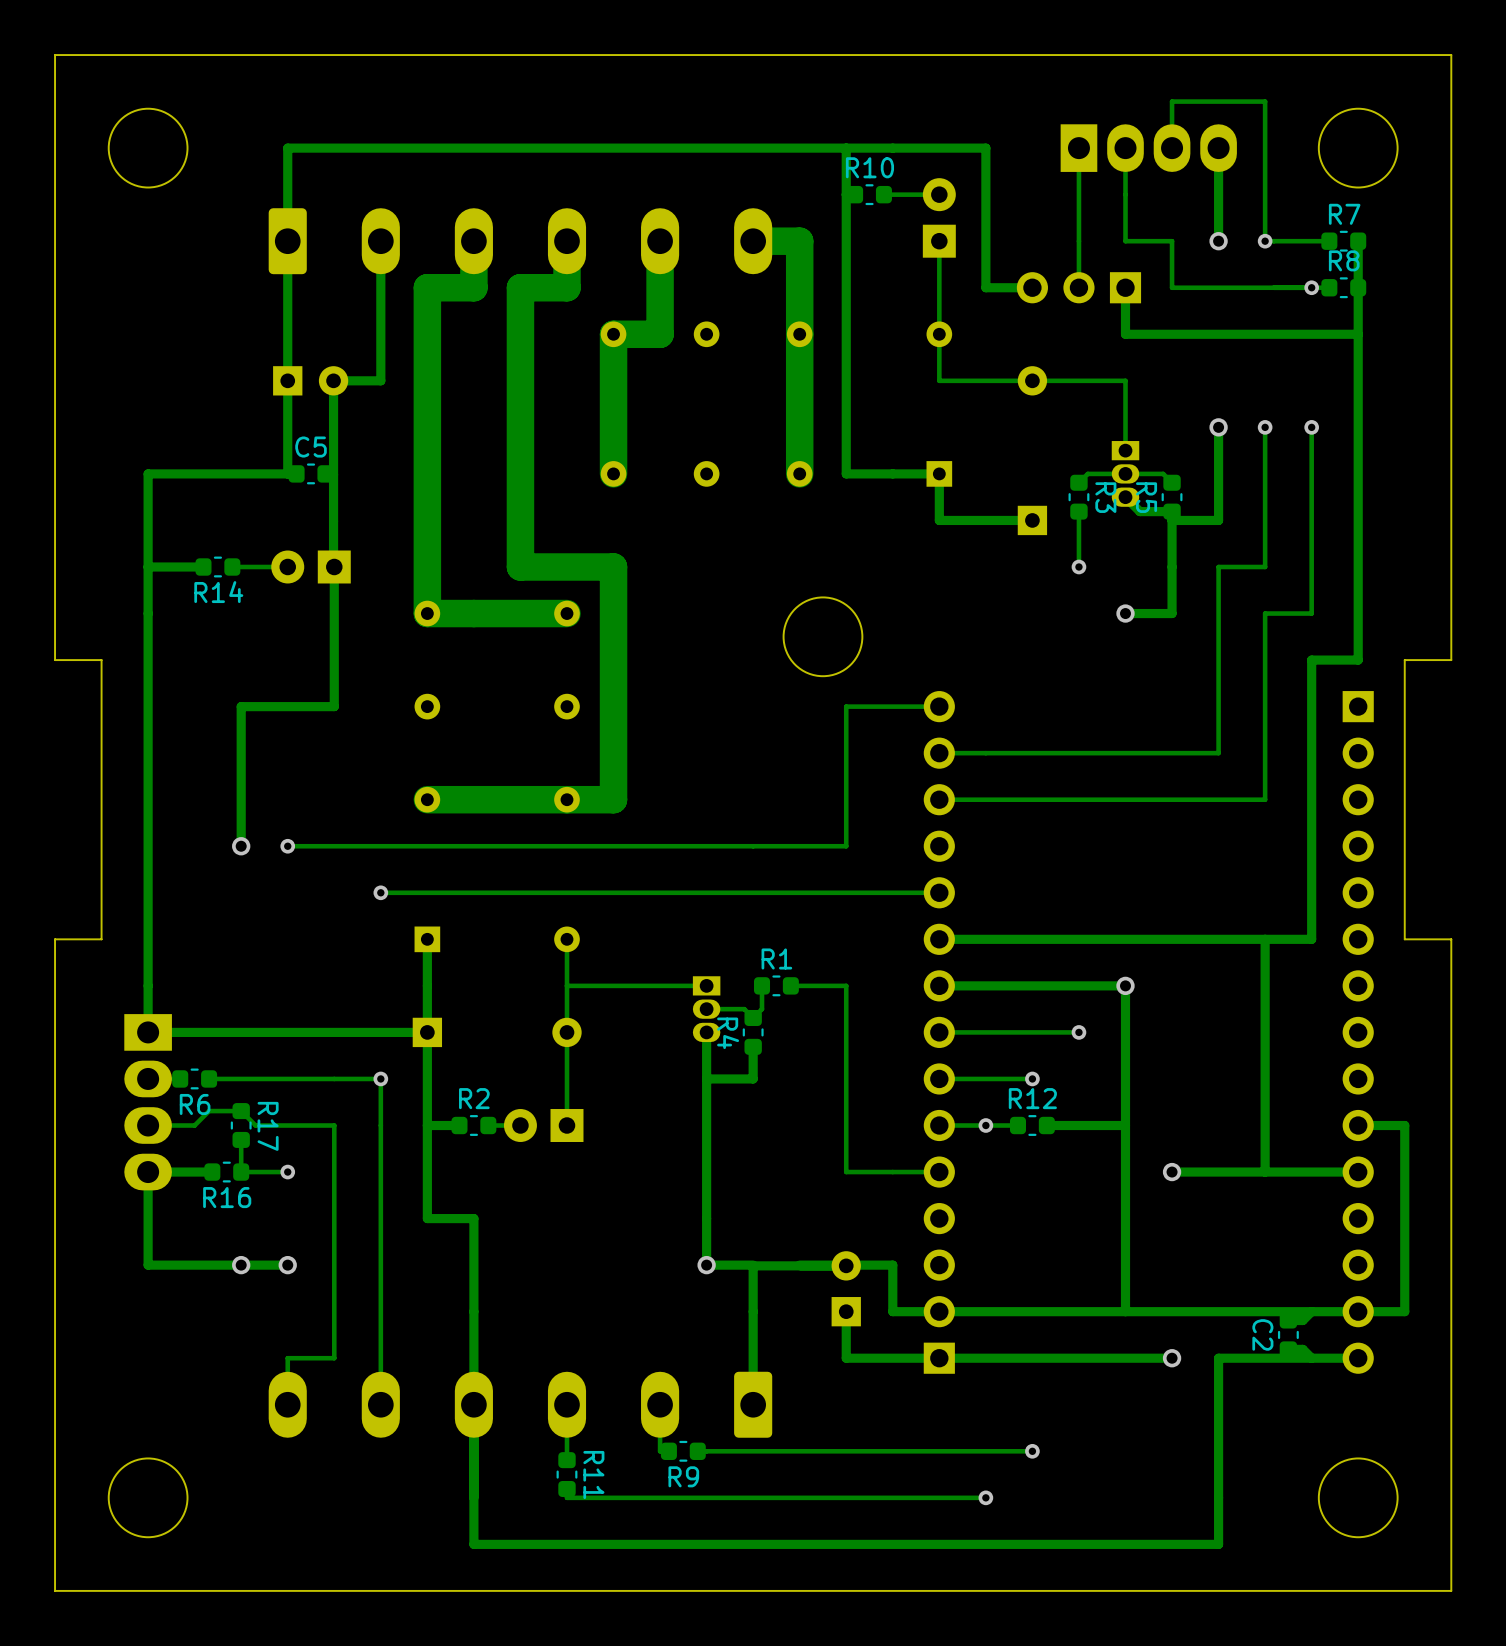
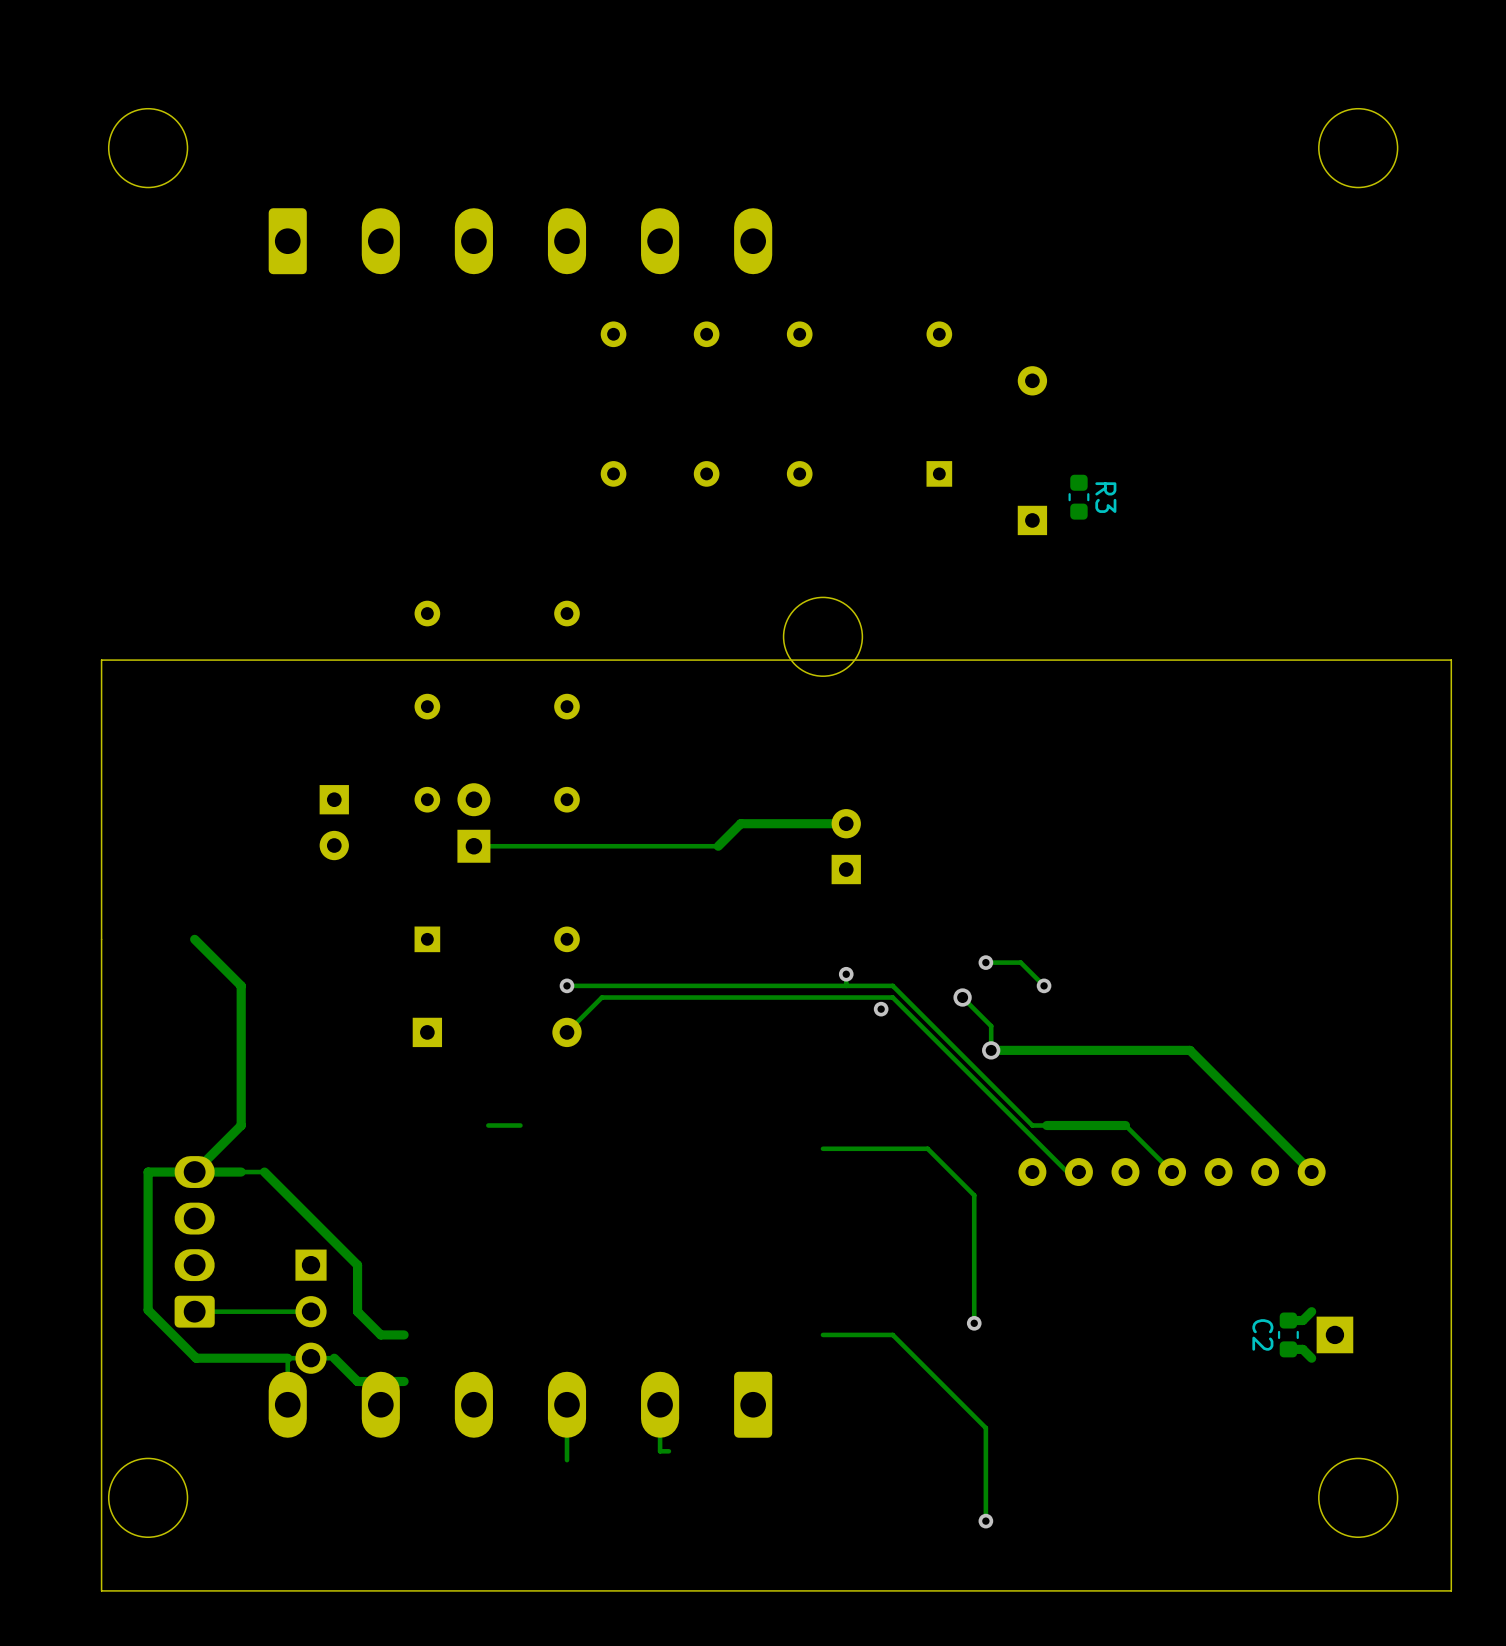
track: (846, 148) (846, 473) (939, 473) (939, 520) (1032, 520) -> none
track: (1078, 148) (1078, 287) -> none
track: (1125, 148) (1125, 241) (1172, 241) (1172, 287) (1329, 287) -> none
part: (1148, 148) -> none
track: (1172, 148) (1172, 101) (1265, 101) (1265, 241) (1329, 241) -> none
track: (1218, 148) (1218, 241) -> none
R10: (869, 194) -> none
track: (939, 194) (883, 194) -> none
part: (939, 217) -> none
track: (380, 241) (380, 380) (333, 380) (334, 706) (241, 706) (241, 846) -> none
track: (473, 241) (473, 287) (427, 287) (427, 613) (566, 613) -> none
track: (566, 241) (566, 287) (520, 287) (520, 566) (613, 566) (613, 799) (427, 799) -> none
track: (660, 241) (660, 334) (613, 334) (613, 473) -> none
track: (753, 241) (799, 241) (799, 473) -> none
track: (939, 241) (939, 380) (1125, 380) (1125, 450) -> none
via: (1218, 241) -> none
via: (1265, 241) -> none
R7: (1343, 241) -> none
track: (1358, 241) (1358, 660) (1311, 660) (1311, 939) (939, 939) -> none
track: (1032, 287) (985, 287) (985, 148) (287, 148) (287, 473) -> none
part: (1078, 287) -> none
track: (1125, 287) (1125, 334) (1358, 334) -> none
via: (1311, 287) -> none
R8: (1343, 287) -> none
part: (310, 380) -> none
track: (1218, 427) (1218, 520) (1172, 520) -> none
via: (1218, 427) -> none
track: (1265, 427) (1265, 566) (1218, 566) (1218, 753) (939, 753) -> none
via: (1265, 427) -> none
track: (1311, 427) (1311, 613) (1265, 613) (1265, 799) (939, 799) -> none
via: (1311, 427) -> none
track: (296, 473) (148, 473) (148, 1032) (427, 1032) -> none
C5: (311, 473) -> none
part: (1125, 473) -> none
track: (1172, 482) (1163, 473) (1087, 473) (1078, 482) -> none
track: (1125, 497) (1139, 511) (1172, 511) (1172, 613) (1125, 613) -> none
R5: (1172, 497) -> none
track: (1078, 511) (1078, 566) -> none
track: (203, 566) (148, 566) -> none
R14: (217, 566) -> none
track: (287, 566) (232, 566) -> none
part: (311, 566) -> none
via: (1078, 566) -> none
via: (1125, 613) -> none
board edge: (1404, 660) (1404, 939) (1451, 939) -> (1451, 660) (1451, 939)
board edge: (1451, 660) (1451, 55) (55, 55) (55, 660) (101, 660) -> (1404, 660) (101, 660)
track: (939, 706) (846, 706) (846, 846) (718, 846) -> (846, 823) (740, 823) (718, 846)
part: none -> (334, 822)
part: none -> (473, 822)
via: (241, 846) -> none
via: (287, 846) -> none
track: (473, 846) (287, 846) -> none
part: none -> (846, 846)
via: (380, 892) -> none
track: (939, 892) (380, 892) -> none
board edge: (101, 939) (55, 939) (55, 1590) (101, 1590) -> (101, 939) (101, 1590)
track: none -> (194, 939) (241, 985) (241, 1125) (194, 1172)
track: (427, 939) (427, 1218) (473, 1218) (473, 1544) (1218, 1544) (1218, 1358) (1358, 1358) -> none
track: (566, 939) (566, 1125) -> none
track: (1265, 939) (1265, 1172) -> none
track: none -> (985, 962) (1020, 962) (1044, 985)
via: none -> (985, 962)
track: none -> (846, 974) (846, 985) (892, 985) (1032, 1125) (1046, 1125)
via: none -> (846, 974)
via: none -> (566, 985)
track: (762, 985) (762, 1009) (753, 1017) (744, 1009) (706, 1009) -> none
R1: (776, 985) -> none
track: none -> (790, 985) (706, 985)
track: (846, 985) (846, 1172) (939, 1172) -> none
track: (939, 985) (1125, 985) (1125, 1311) -> none
via: none -> (1044, 985)
via: (1125, 985) -> none
track: none -> (962, 997) (991, 1026) (991, 1050) (1190, 1050) (1311, 1172)
via: none -> (962, 997)
part: (706, 1009) -> none
via: none -> (881, 1009)
track: none -> (566, 1032) (601, 997) (892, 997) (1067, 1172) (1078, 1172)
track: (706, 1032) (706, 1265) (753, 1265) -> none
R4: (753, 1032) -> none
part: (939, 1032) -> none
track: (1078, 1032) (939, 1032) -> none
via: (1078, 1032) -> none
part: (1358, 1032) -> none
track: (753, 1046) (753, 1078) (706, 1078) -> none
via: none -> (991, 1050)
R6: (194, 1078) -> none
track: (209, 1078) (380, 1078) (380, 1404) -> none
via: (380, 1078) -> none
track: (1032, 1078) (939, 1078) -> none
via: (1032, 1078) -> none
part: (148, 1102) -> none
track: (148, 1125) (194, 1125) (209, 1111) (241, 1111) (255, 1125) (334, 1125) (334, 1358) -> (404, 1381) (357, 1381) (334, 1358)
R17: (241, 1125) -> none
track: (459, 1125) (427, 1125) -> none
R2: (473, 1125) -> none
part: (543, 1125) -> none
via: (985, 1125) -> none
track: (1017, 1125) (939, 1125) -> none
R12: (1032, 1125) -> none
track: (1358, 1125) (1404, 1125) (1404, 1311) (892, 1311) (892, 1265) (846, 1265) -> none
track: (241, 1139) (241, 1172) -> (212, 1172) (241, 1172)
track: none -> (822, 1148) (927, 1148) (974, 1195) (974, 1323)
R16: (226, 1172) -> none
track: (287, 1172) (264, 1172) -> (404, 1334) (380, 1334) (357, 1311) (357, 1265) (264, 1172)
via: (287, 1172) -> none
part: none -> (1172, 1172)
via: (1172, 1172) -> none
track: (1358, 1172) (1172, 1172) -> (1125, 1125) (1172, 1172)
part: none -> (194, 1241)
via: (241, 1265) -> none
track: (287, 1265) (148, 1265) -> (287, 1358) (196, 1358) (148, 1310) (148, 1265)
via: (287, 1265) -> none
via: (706, 1265) -> none
track: (846, 1265) (753, 1266) (753, 1404) -> none
part: (846, 1288) -> none
track: none -> (311, 1311) (194, 1311)
part: none -> (311, 1311)
track: (846, 1311) (846, 1358) (1172, 1358) -> none
via: none -> (974, 1323)
track: none -> (822, 1334) (892, 1334) (985, 1428) (985, 1521)
part: none -> (1334, 1334)
via: (1172, 1358) -> none
R9: (683, 1451) -> none
track: (1032, 1451) (697, 1451) -> none
via: (1032, 1451) -> none
R11: (566, 1474) -> none
track: (566, 1489) (566, 1497) (985, 1497) -> none
via position: (985, 1497) -> (985, 1521)

